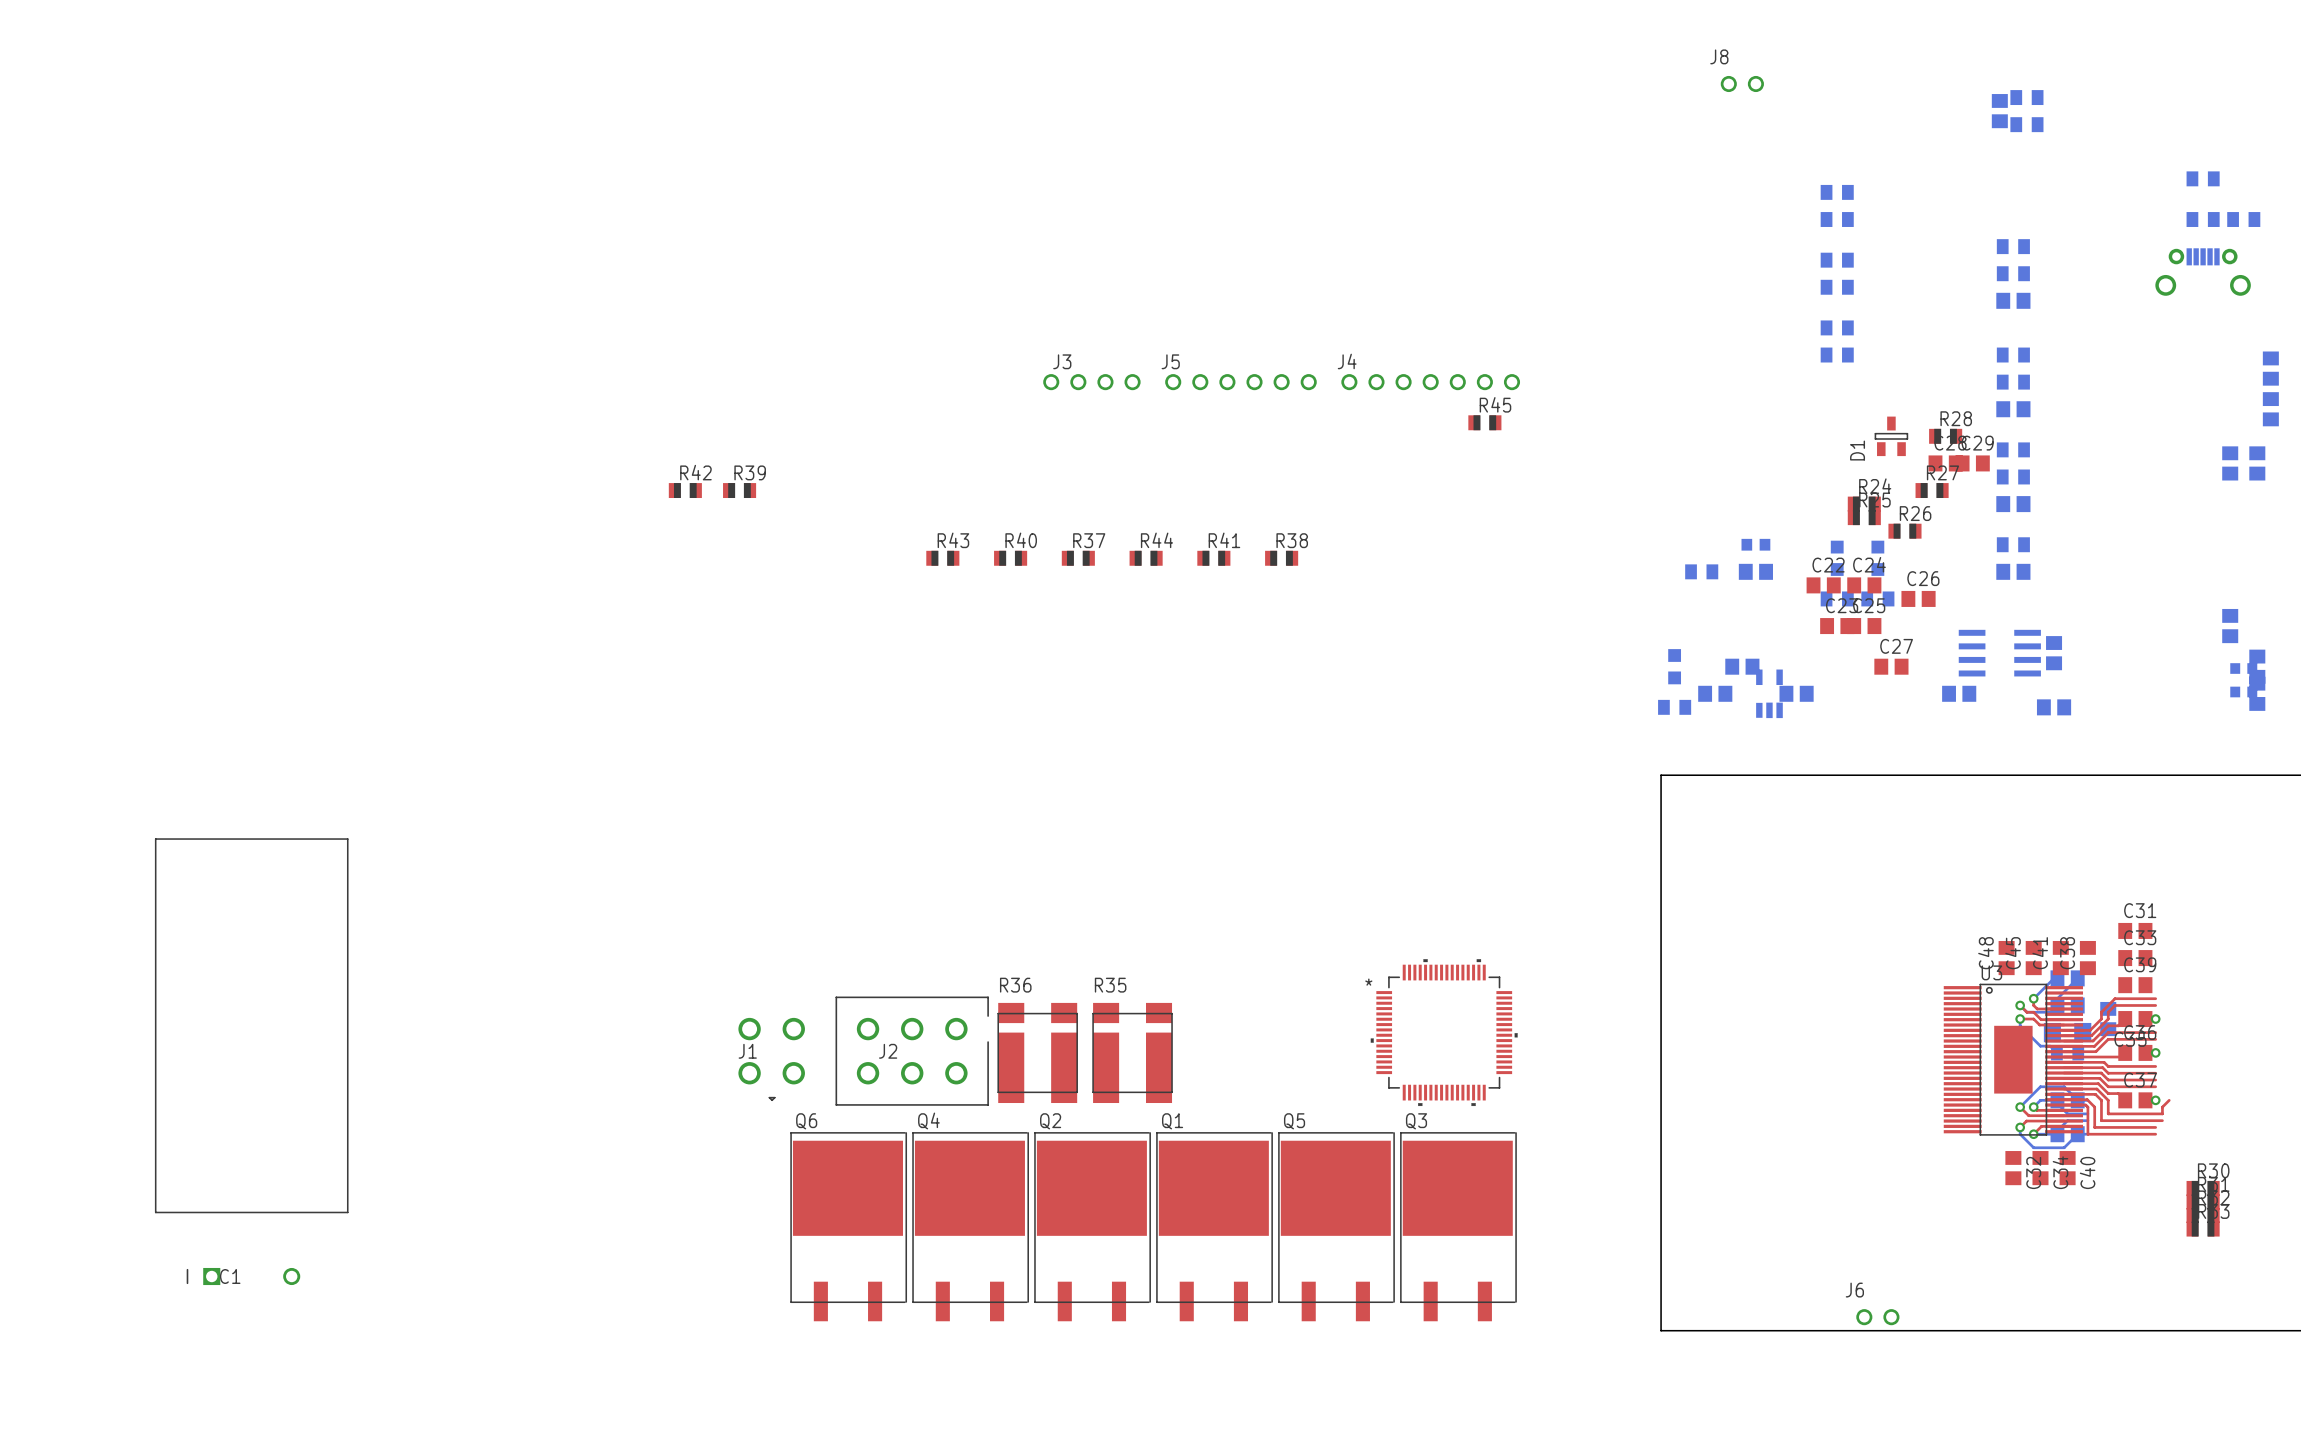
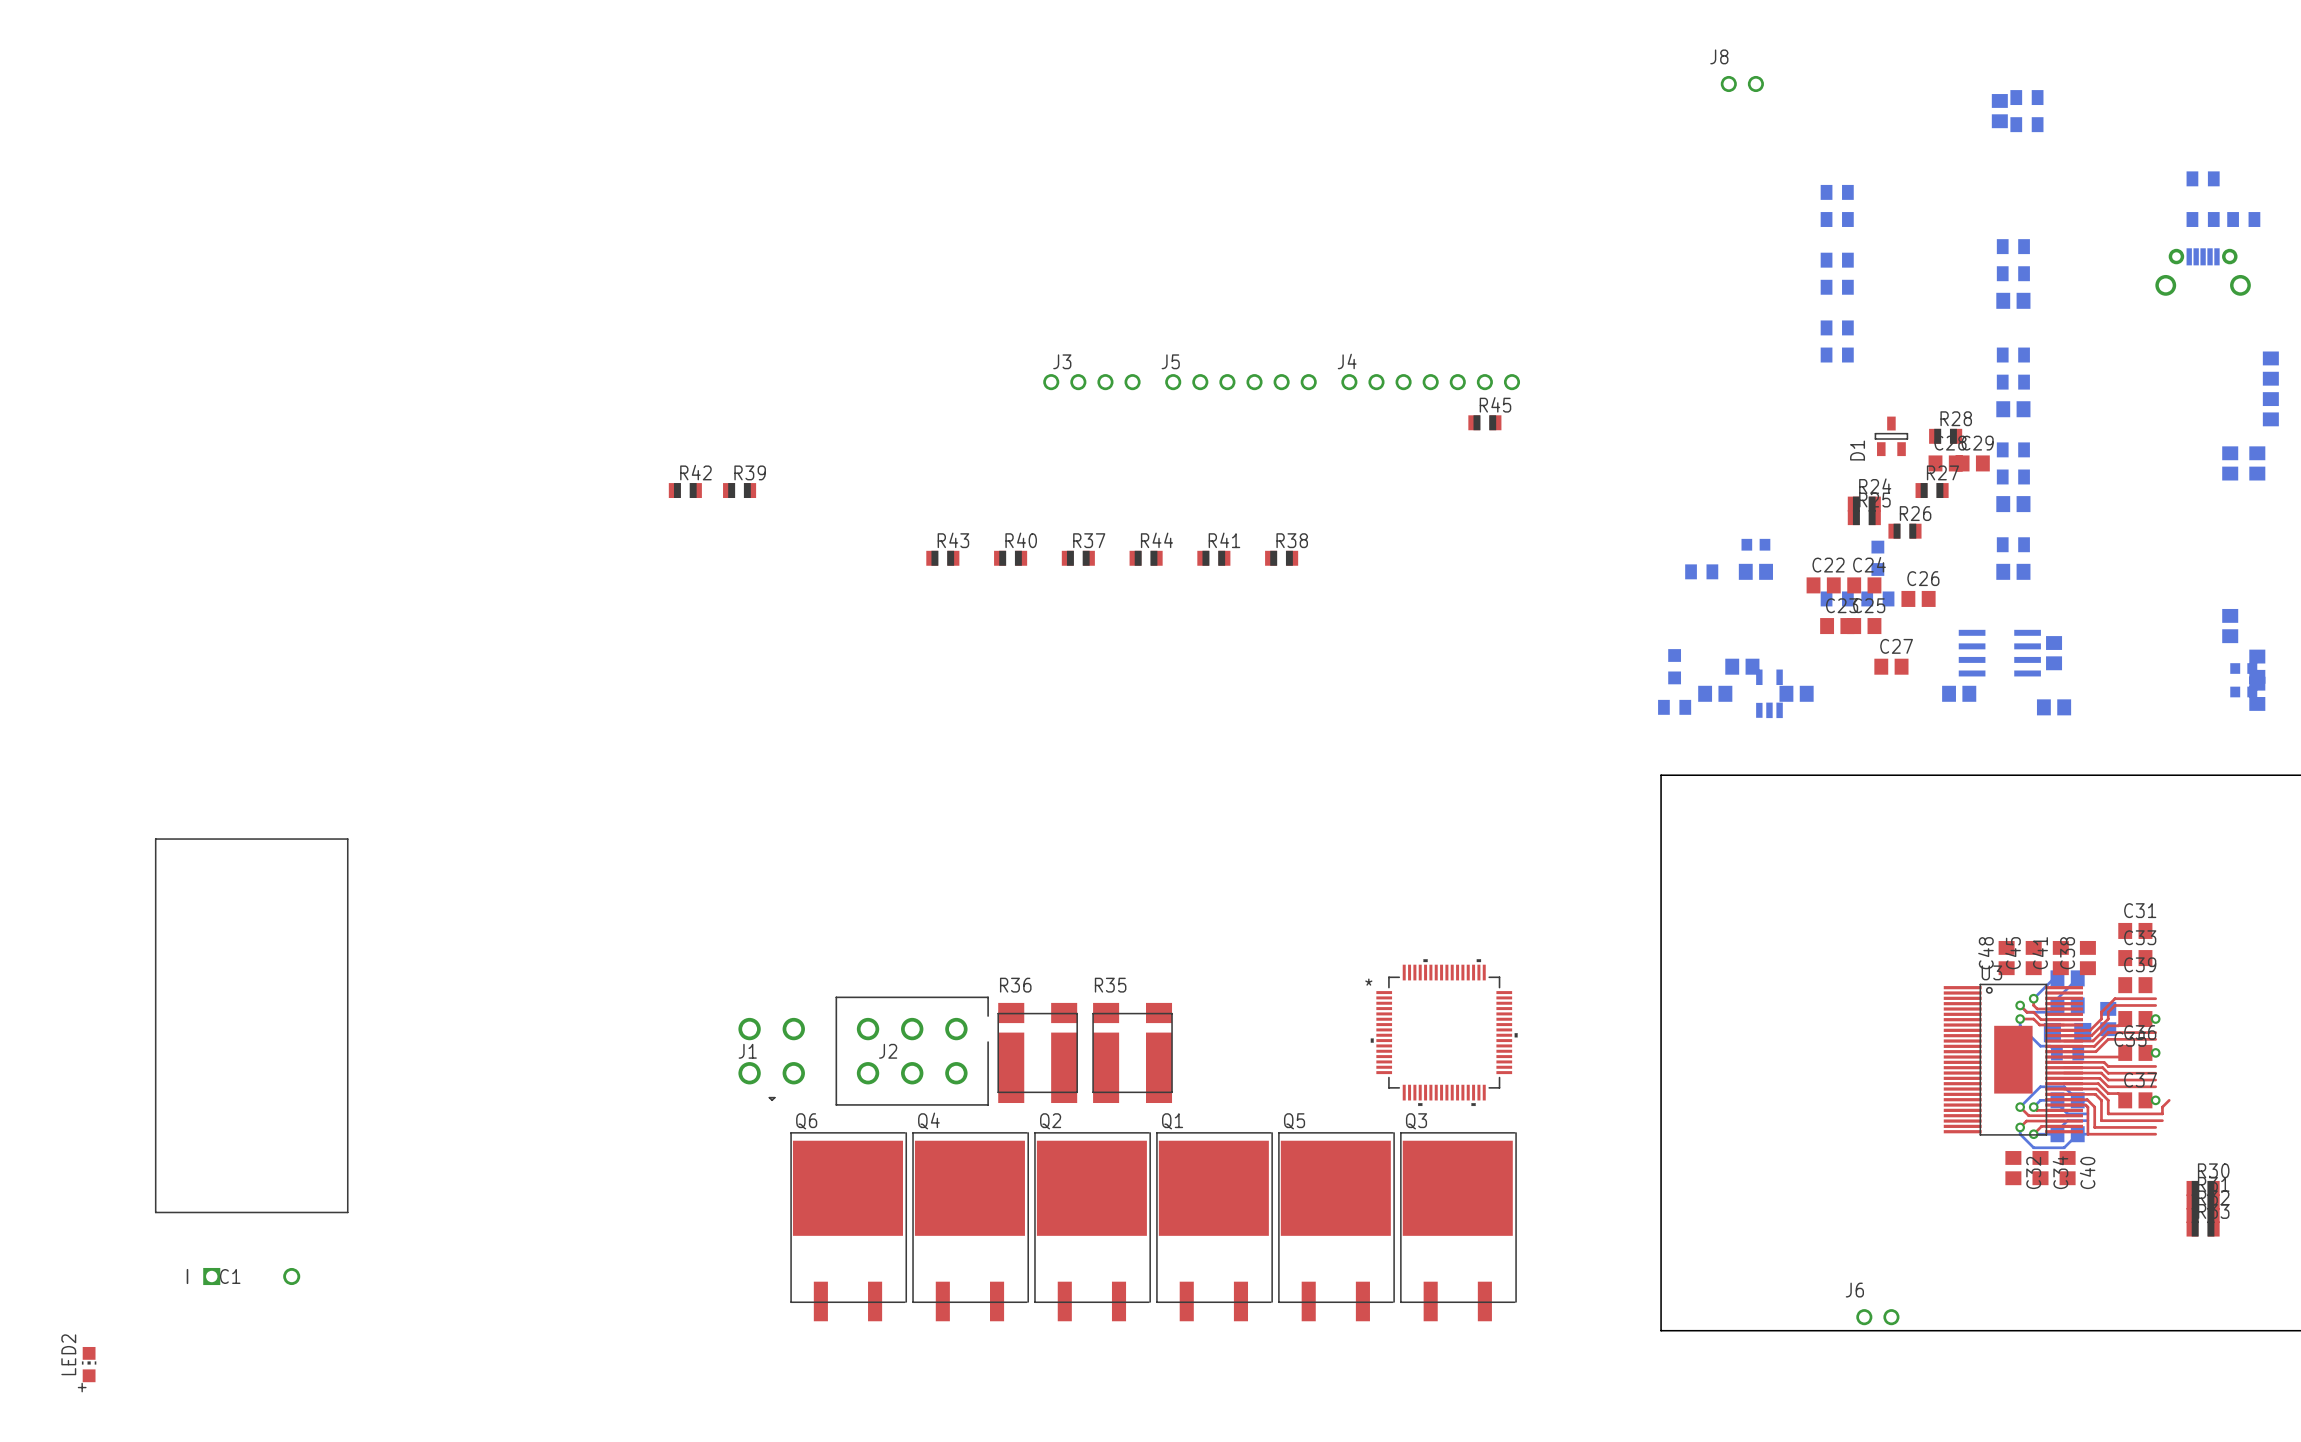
part: (1837, 558) -> none
LED2: none -> (89, 1364)

